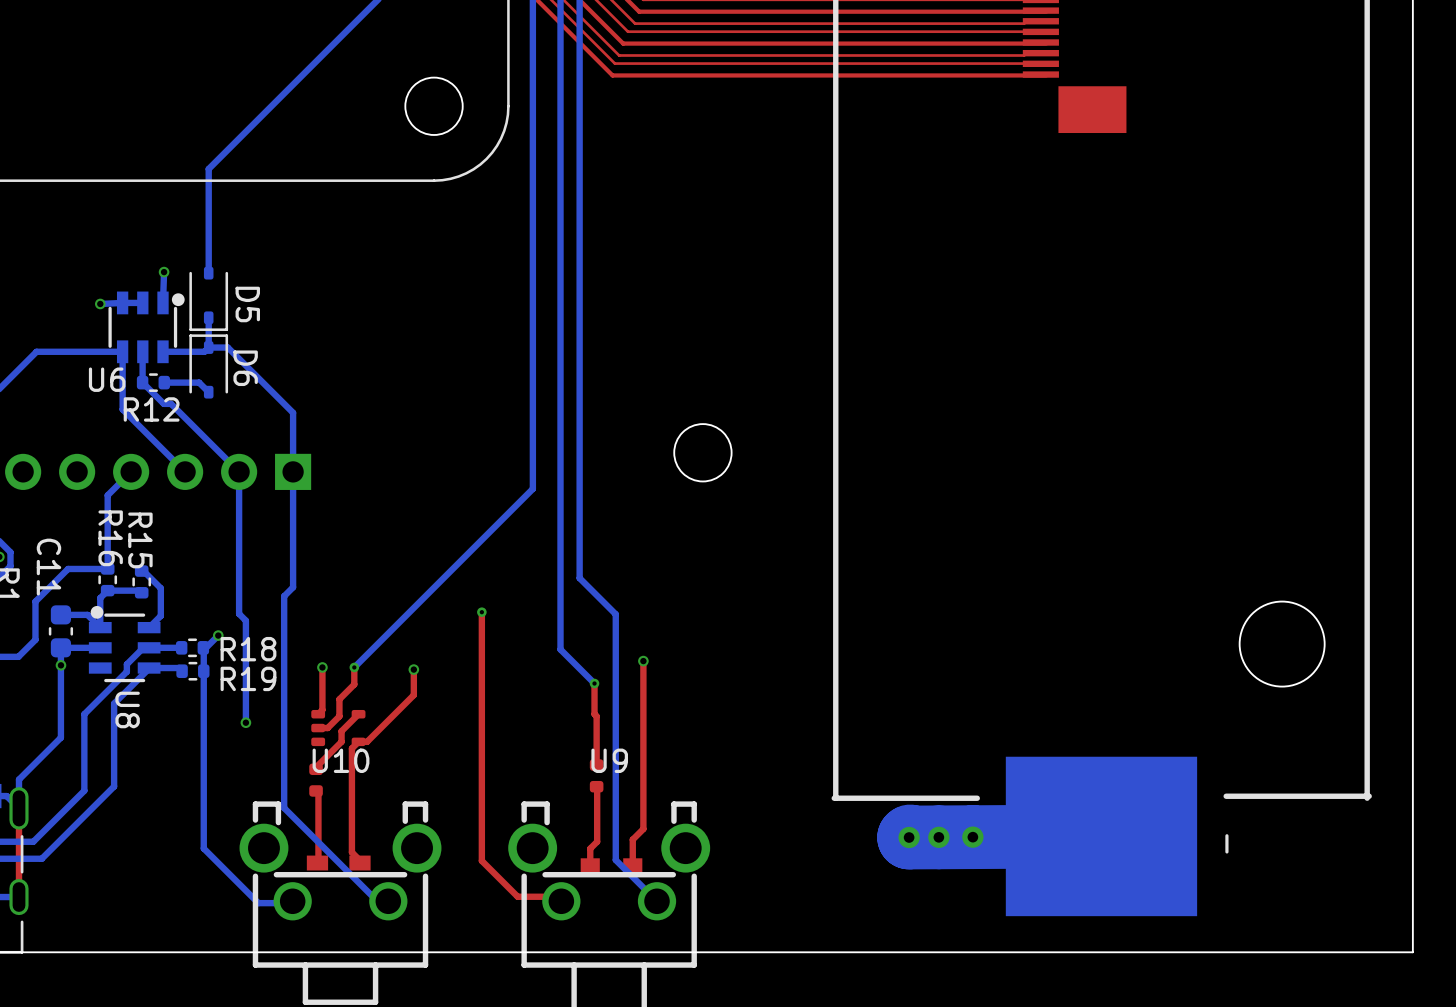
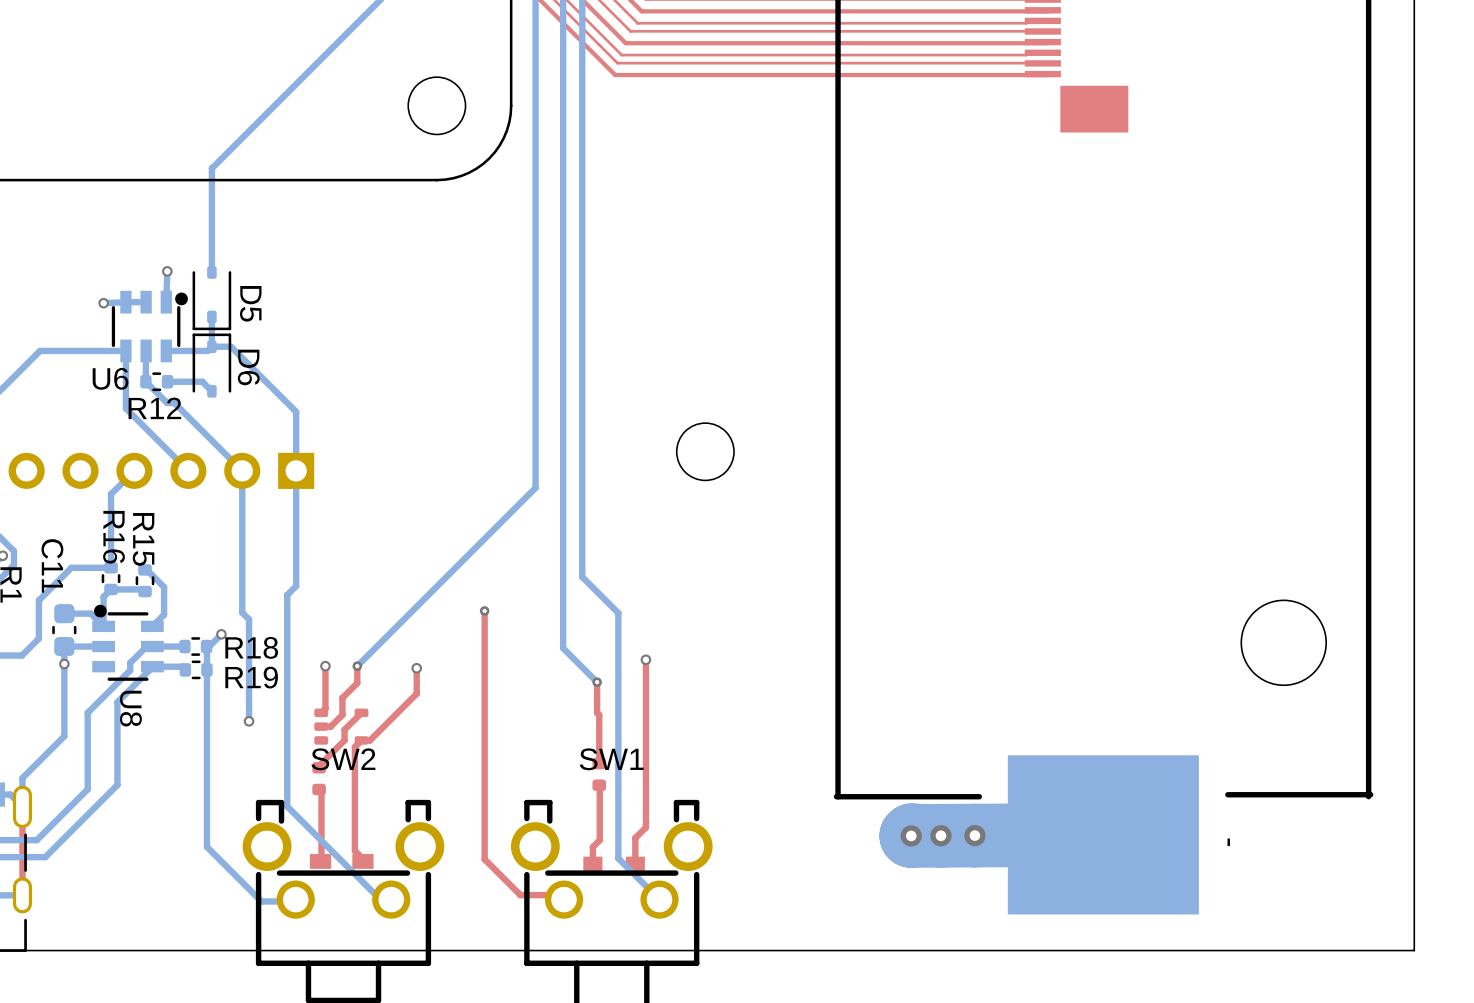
U10 name: U10 (341, 760) -> SW2 (343, 759)
U9 name: U9 (609, 760) -> SW1 (611, 759)

